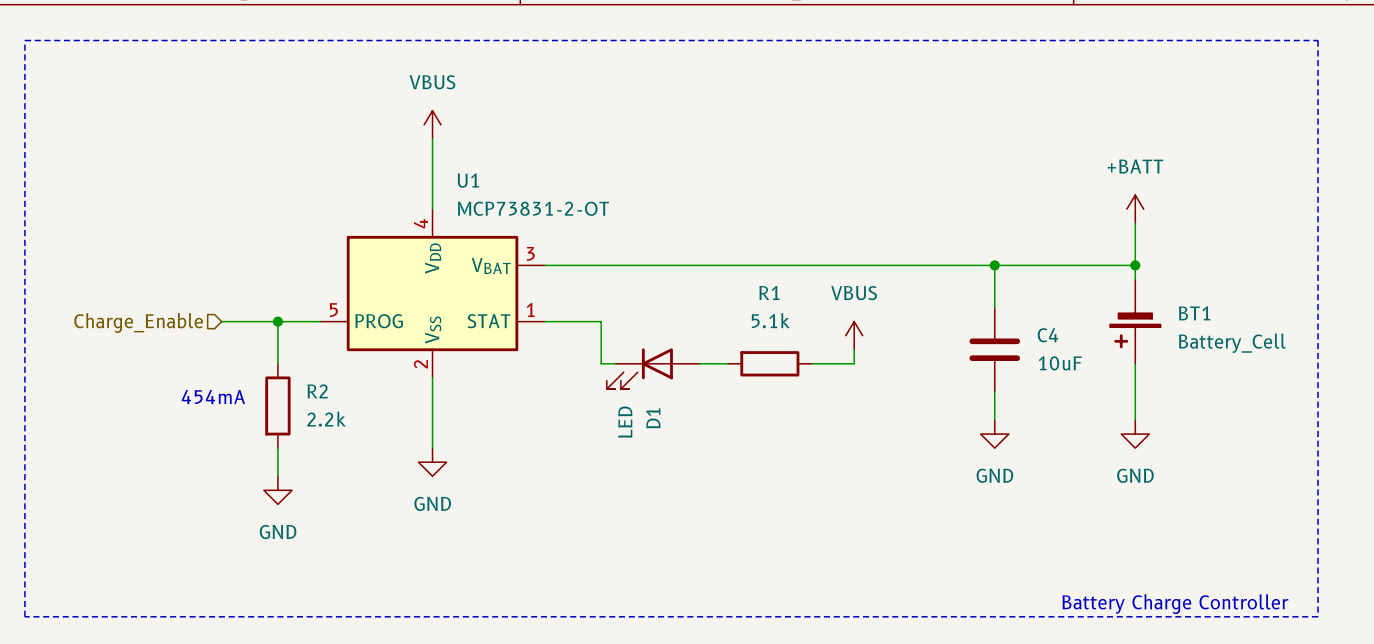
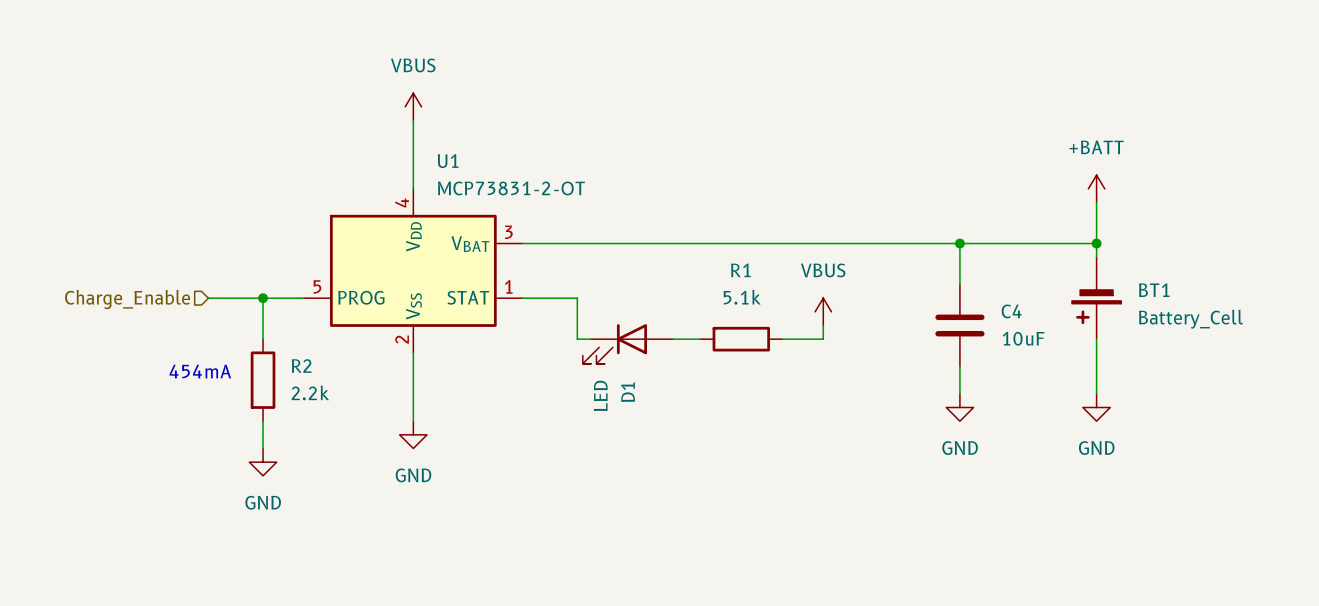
line: (24, 40) (1318, 40) (1318, 616) (24, 616) (24, 40) -> none
text: Battery Charge Controller (1175, 604) -> none

